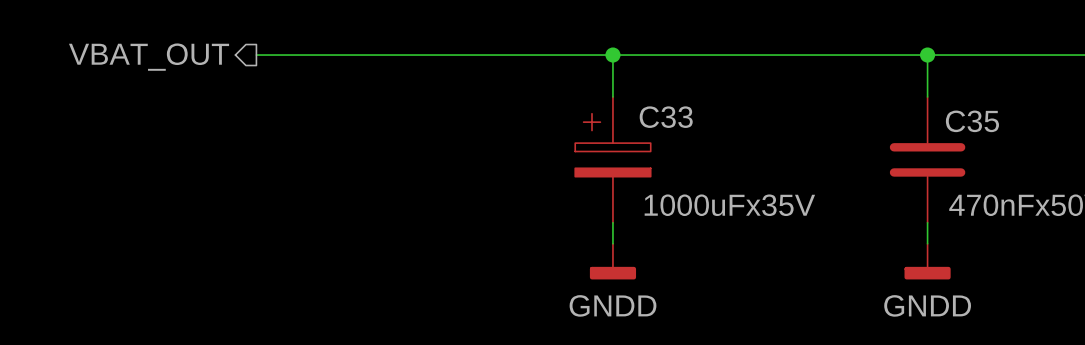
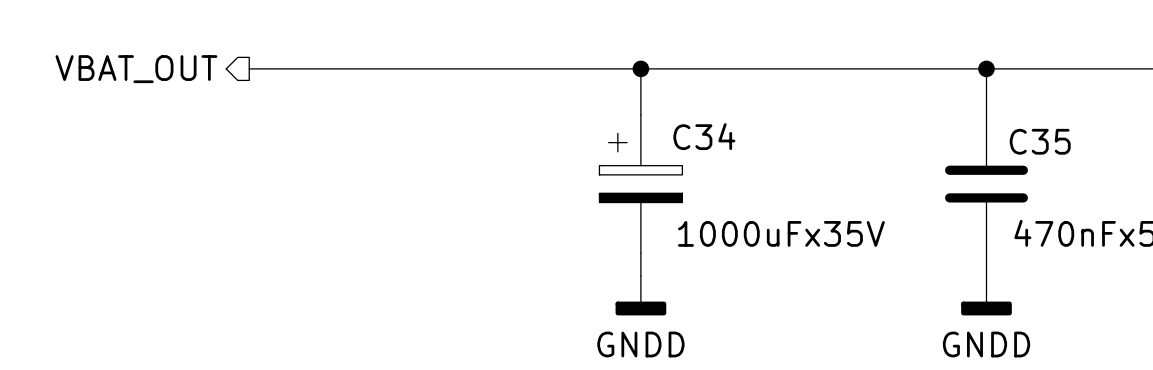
C33 name: C33 (666, 117) -> C34 (704, 136)

